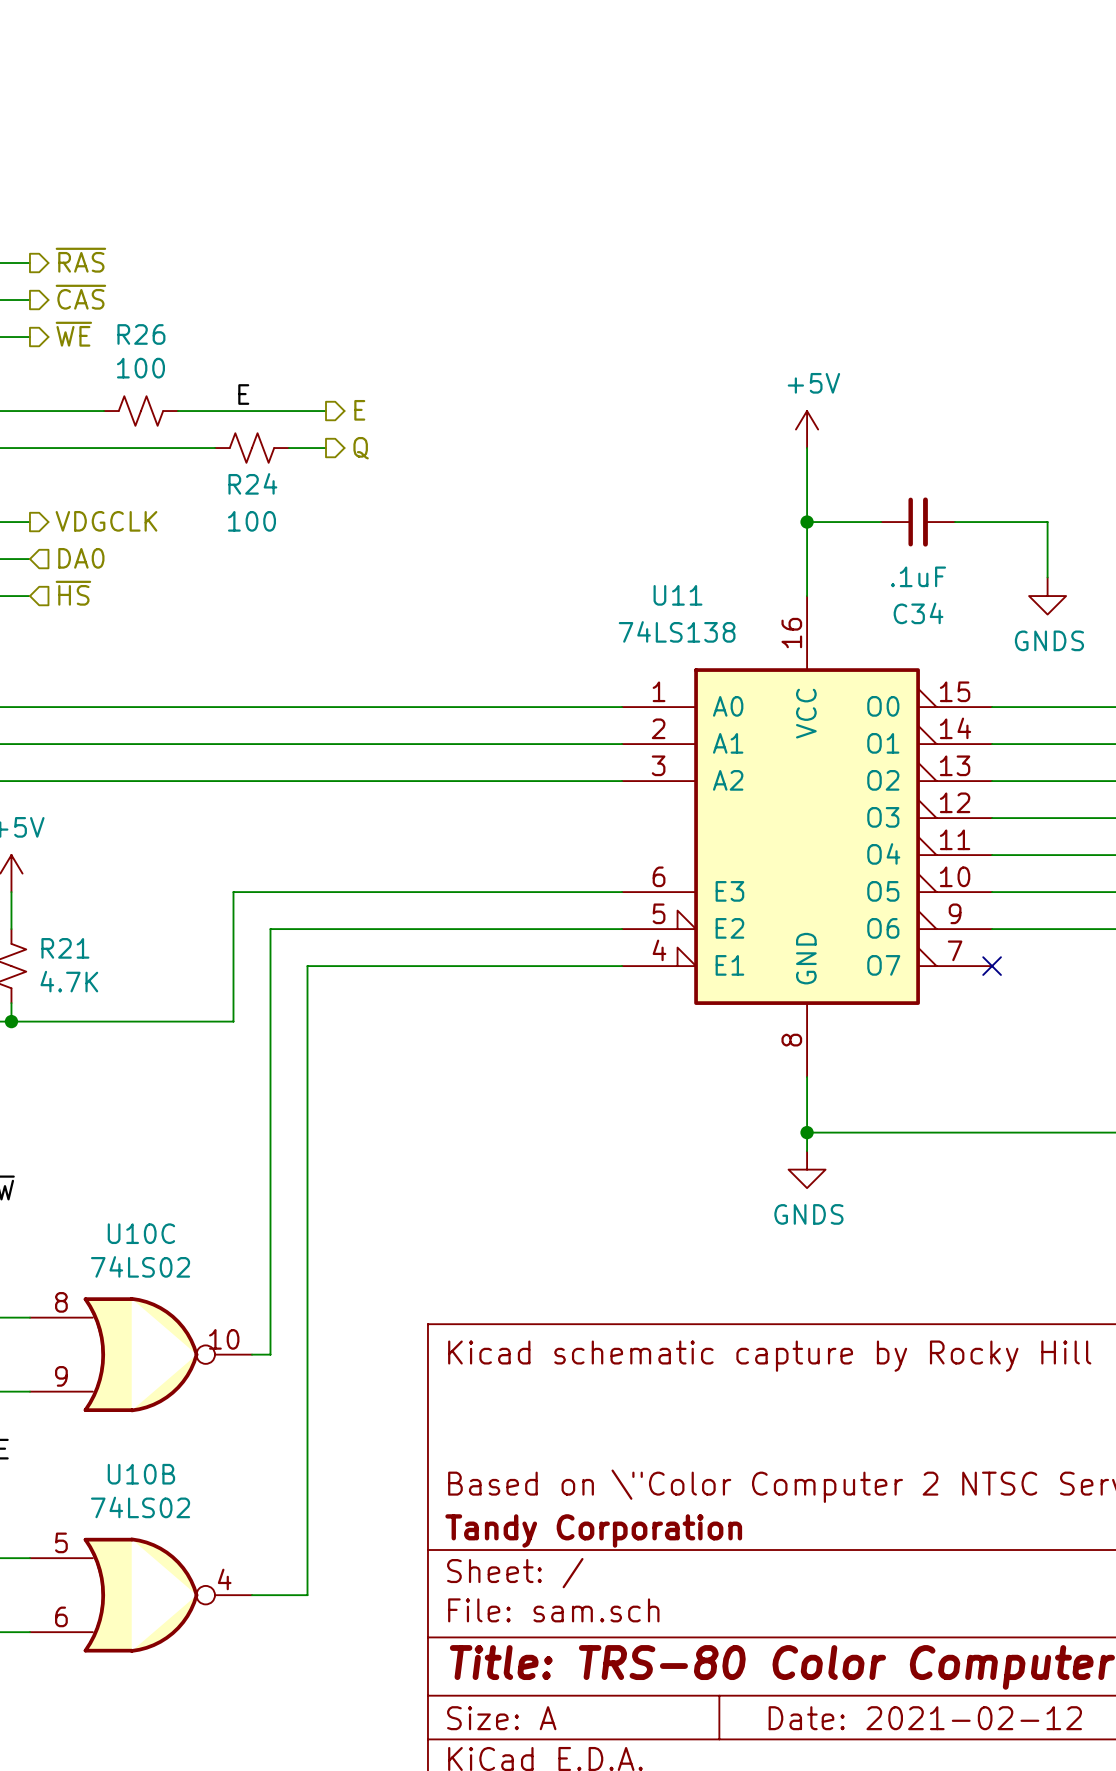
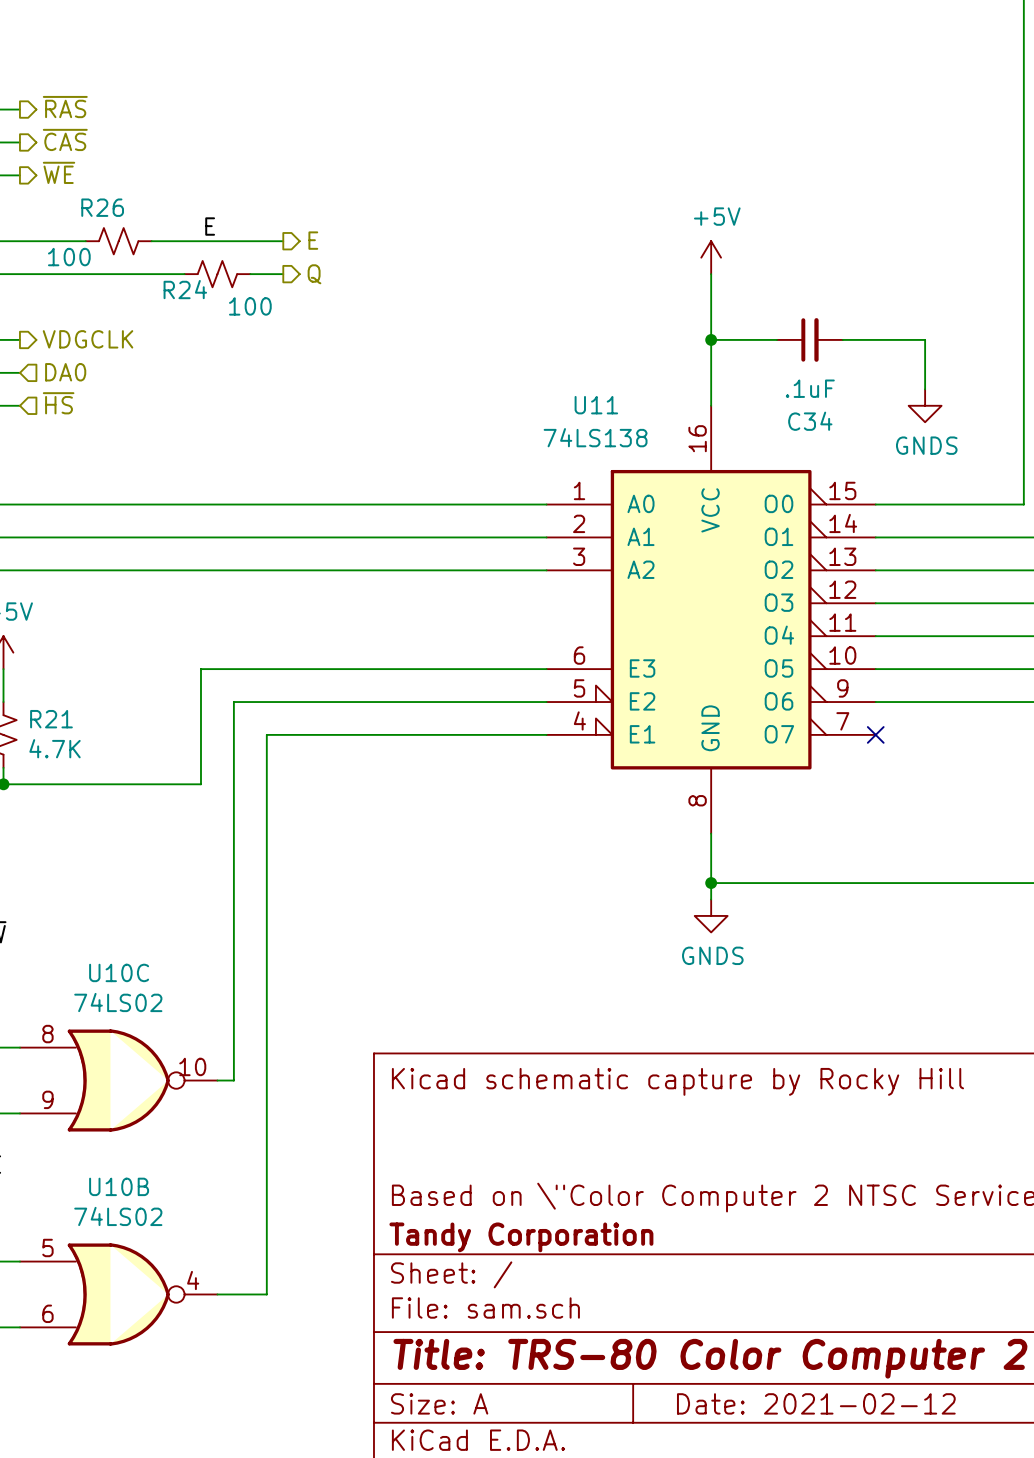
R26 name position: R26 (141, 334) -> R26 (102, 207)
R26 value position: 100 (140, 368) -> 100 (69, 257)
R24 name position: R24 (252, 483) -> R24 (185, 289)
R24 value position: 100 (251, 521) -> 100 (250, 306)

